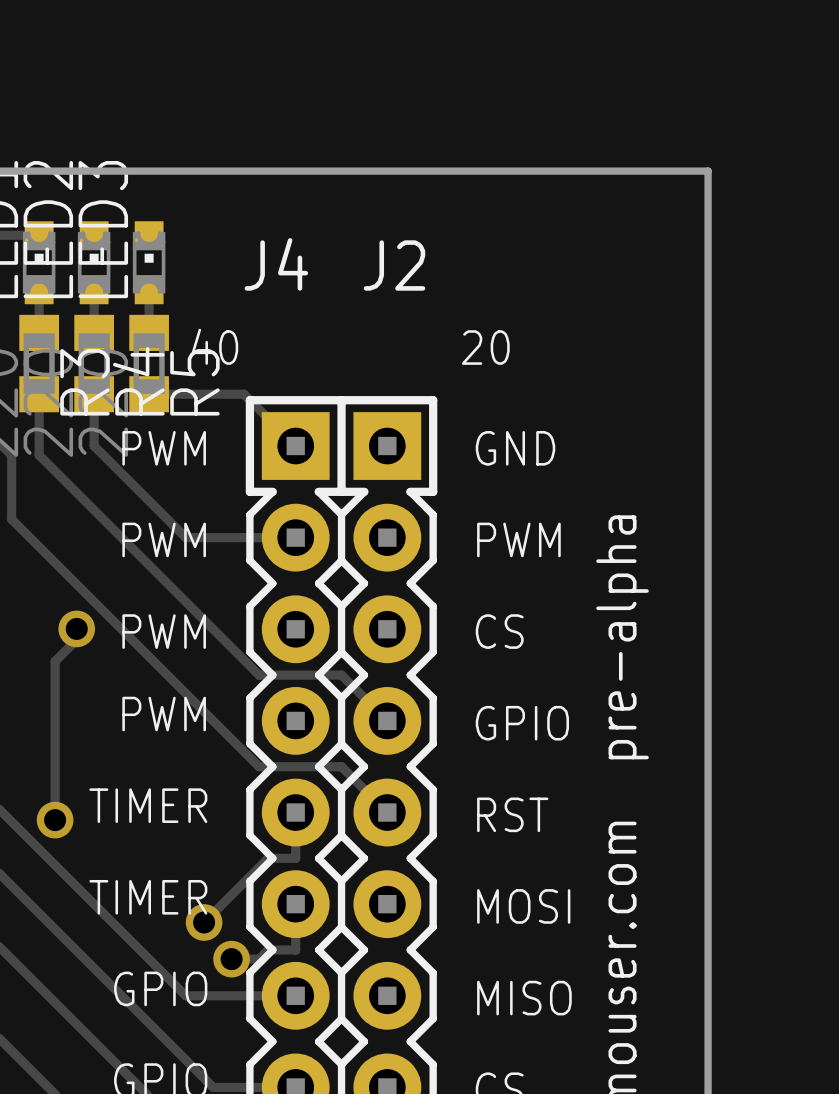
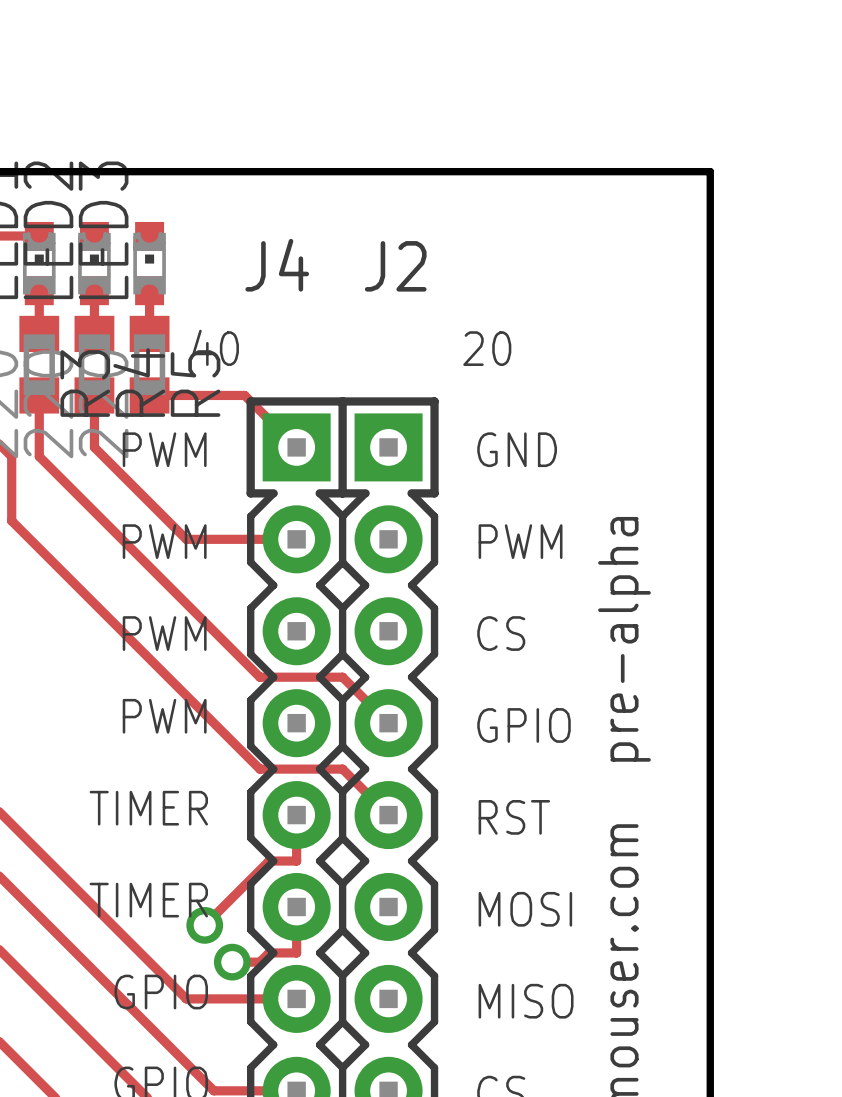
track: (76, 628) (76, 639) (55, 661) (55, 820) -> none
via: (76, 628) -> none
via: (55, 820) -> none

